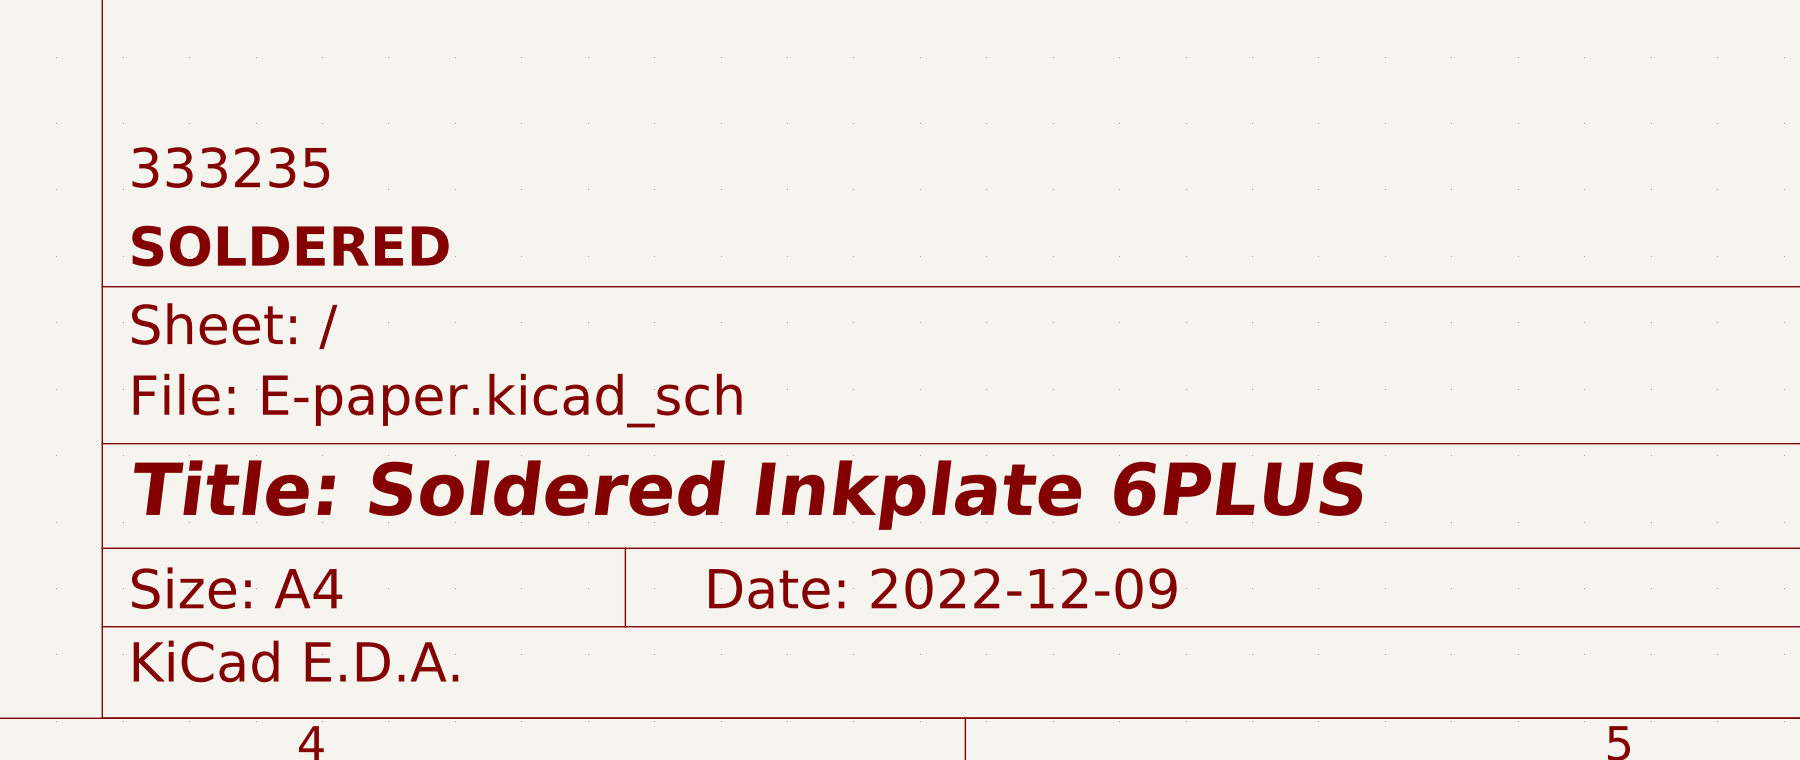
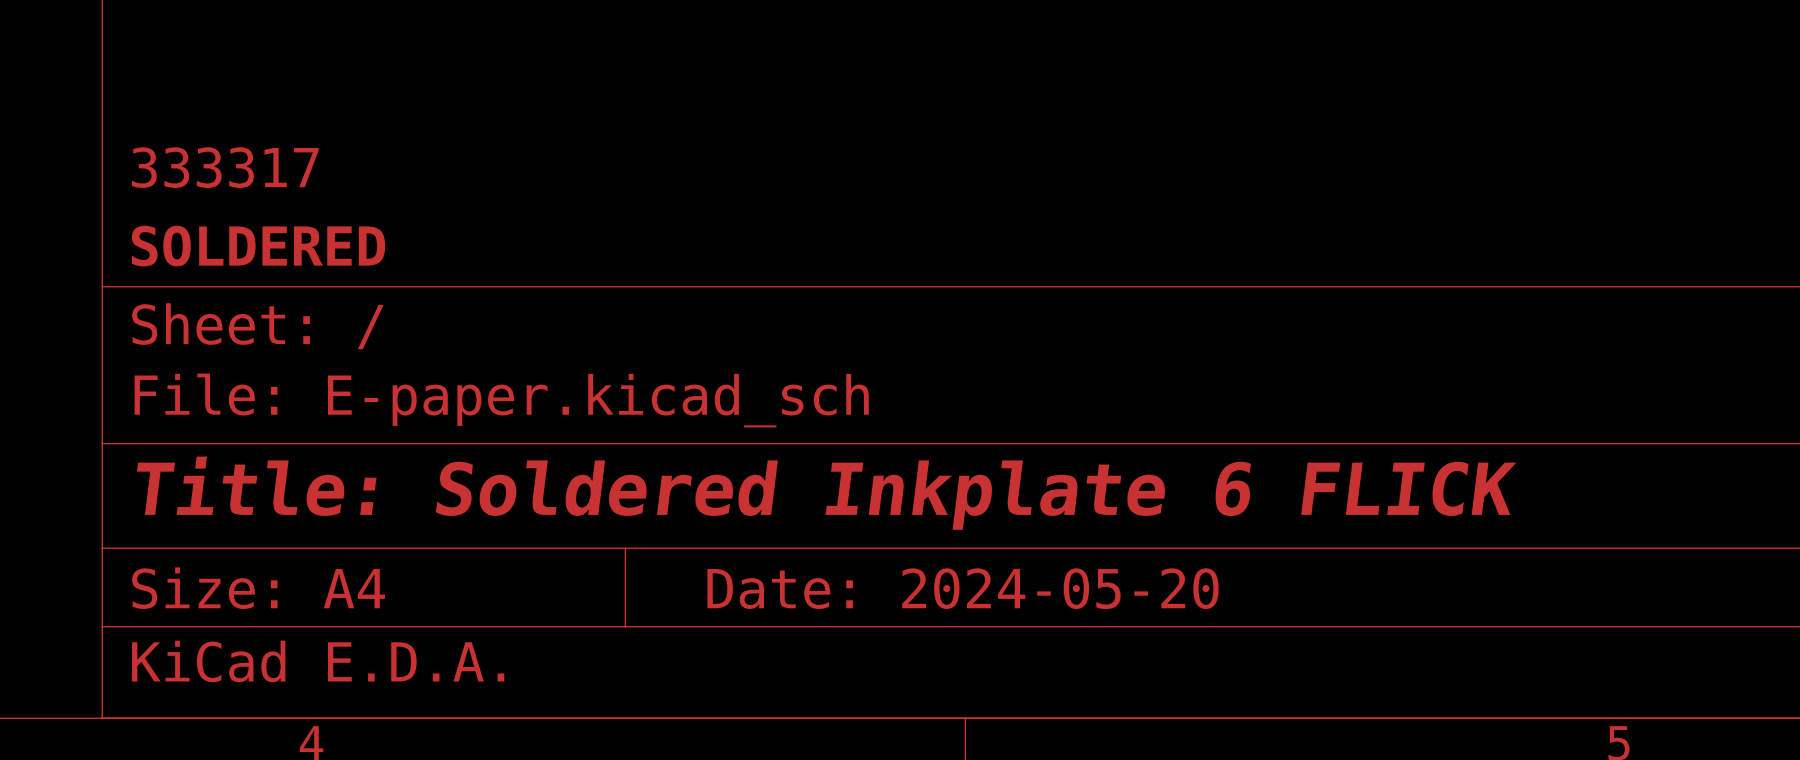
title block: 333235 (230, 167) -> 333317 (225, 167)
title block: Title: Soldered Inkplate 6PLUS (748, 495) -> Title: Soldered Inkplate 6 FLICK (826, 493)
title block: Date: 2022-12-09 (942, 588) -> Date: 2024-05-20 (963, 588)

